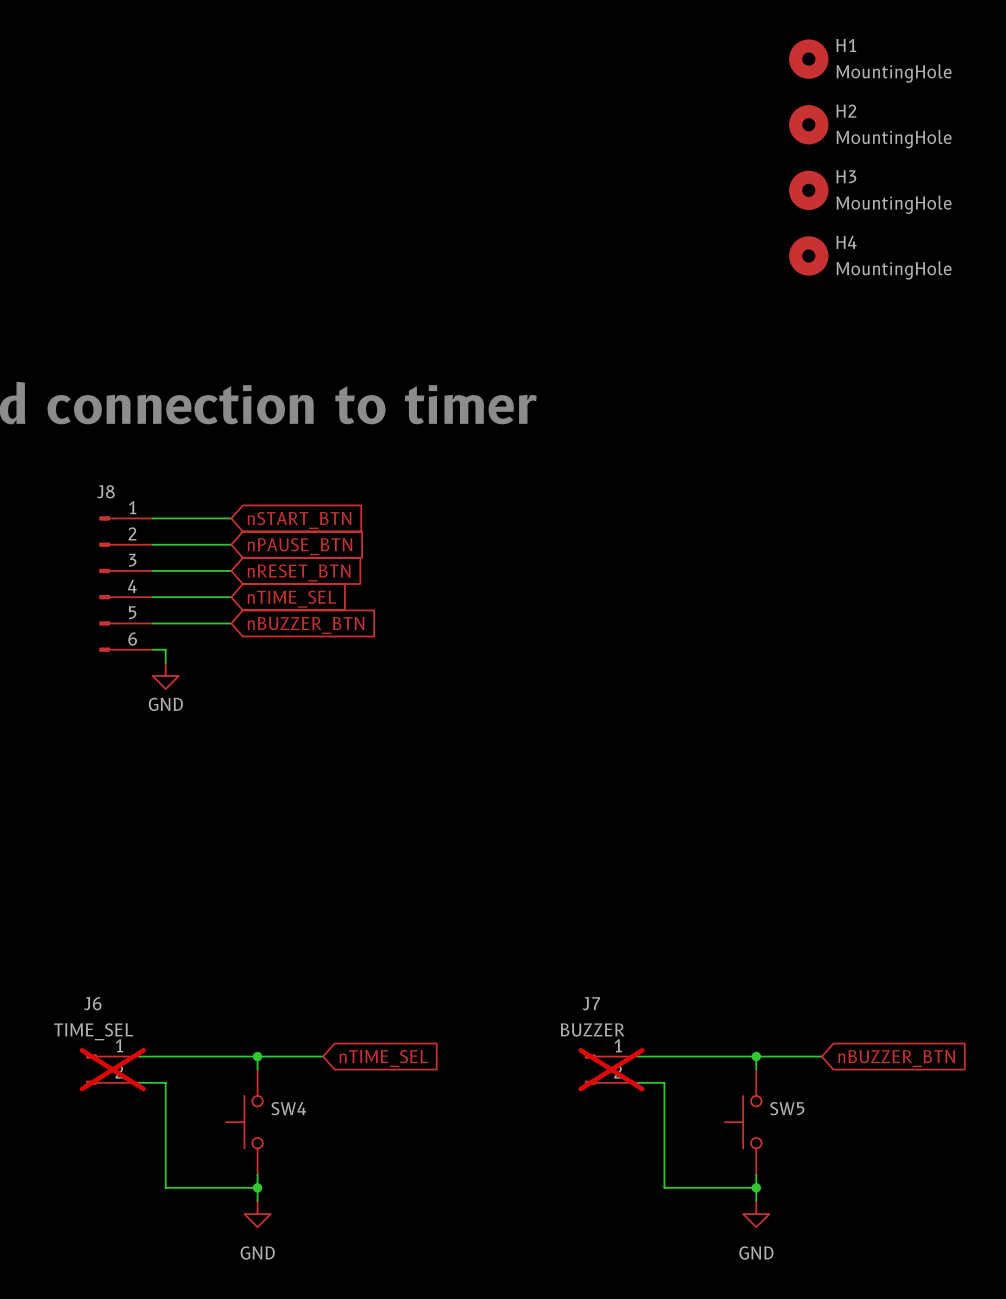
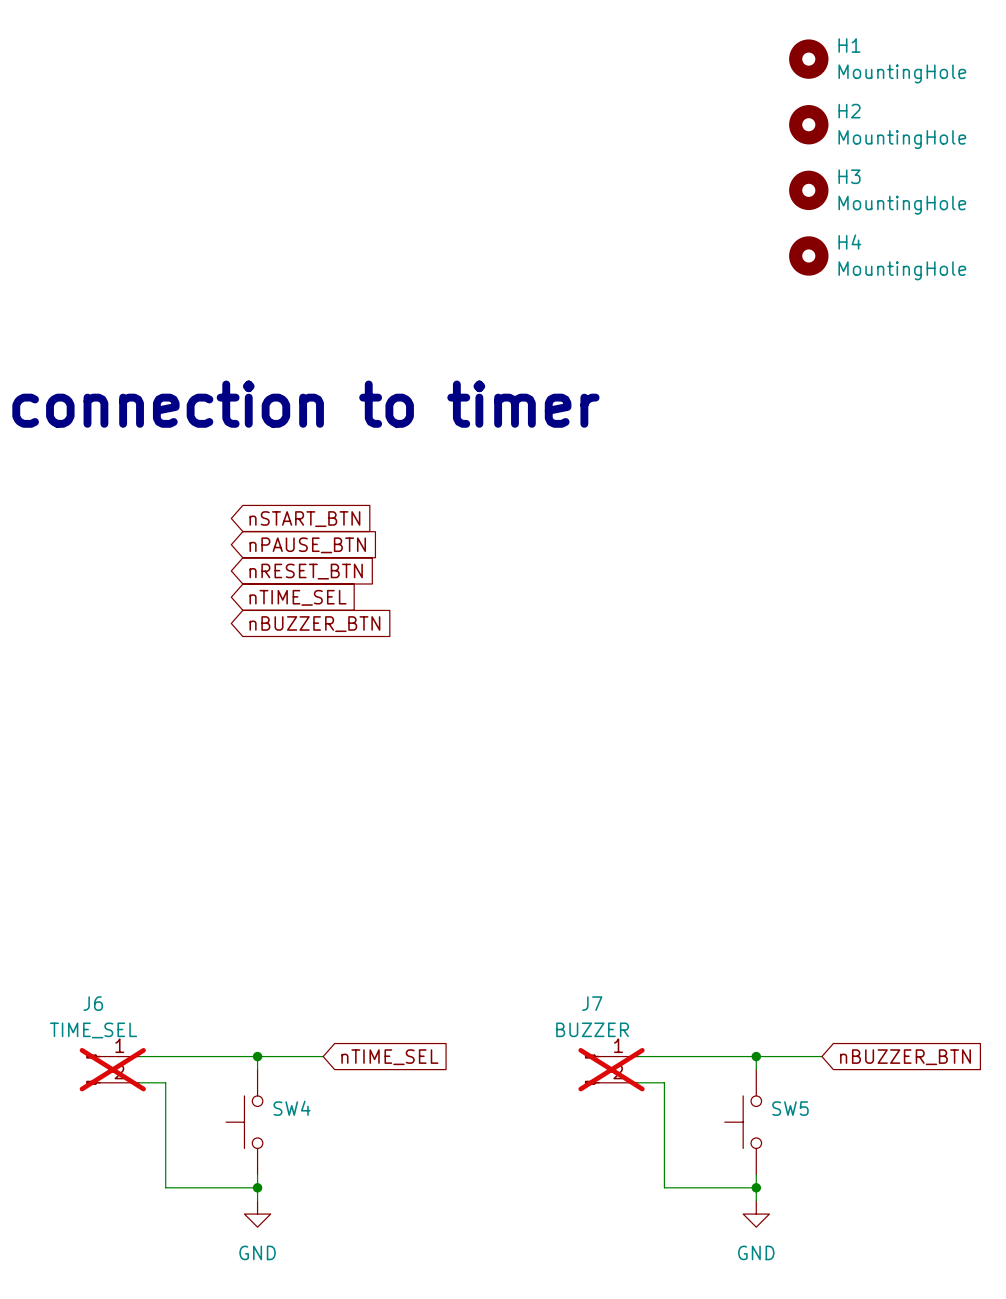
wire: (152, 518) (231, 518) -> none
wire: (152, 544) (231, 544) -> none
wire: (152, 570) (231, 570) -> none
J8: (125, 584) -> none
wire: (152, 597) (231, 597) -> none
wire: (152, 623) (231, 623) -> none
wire: (152, 649) (165, 649) (165, 662) -> none
power symbol: GND (165, 675) -> none

